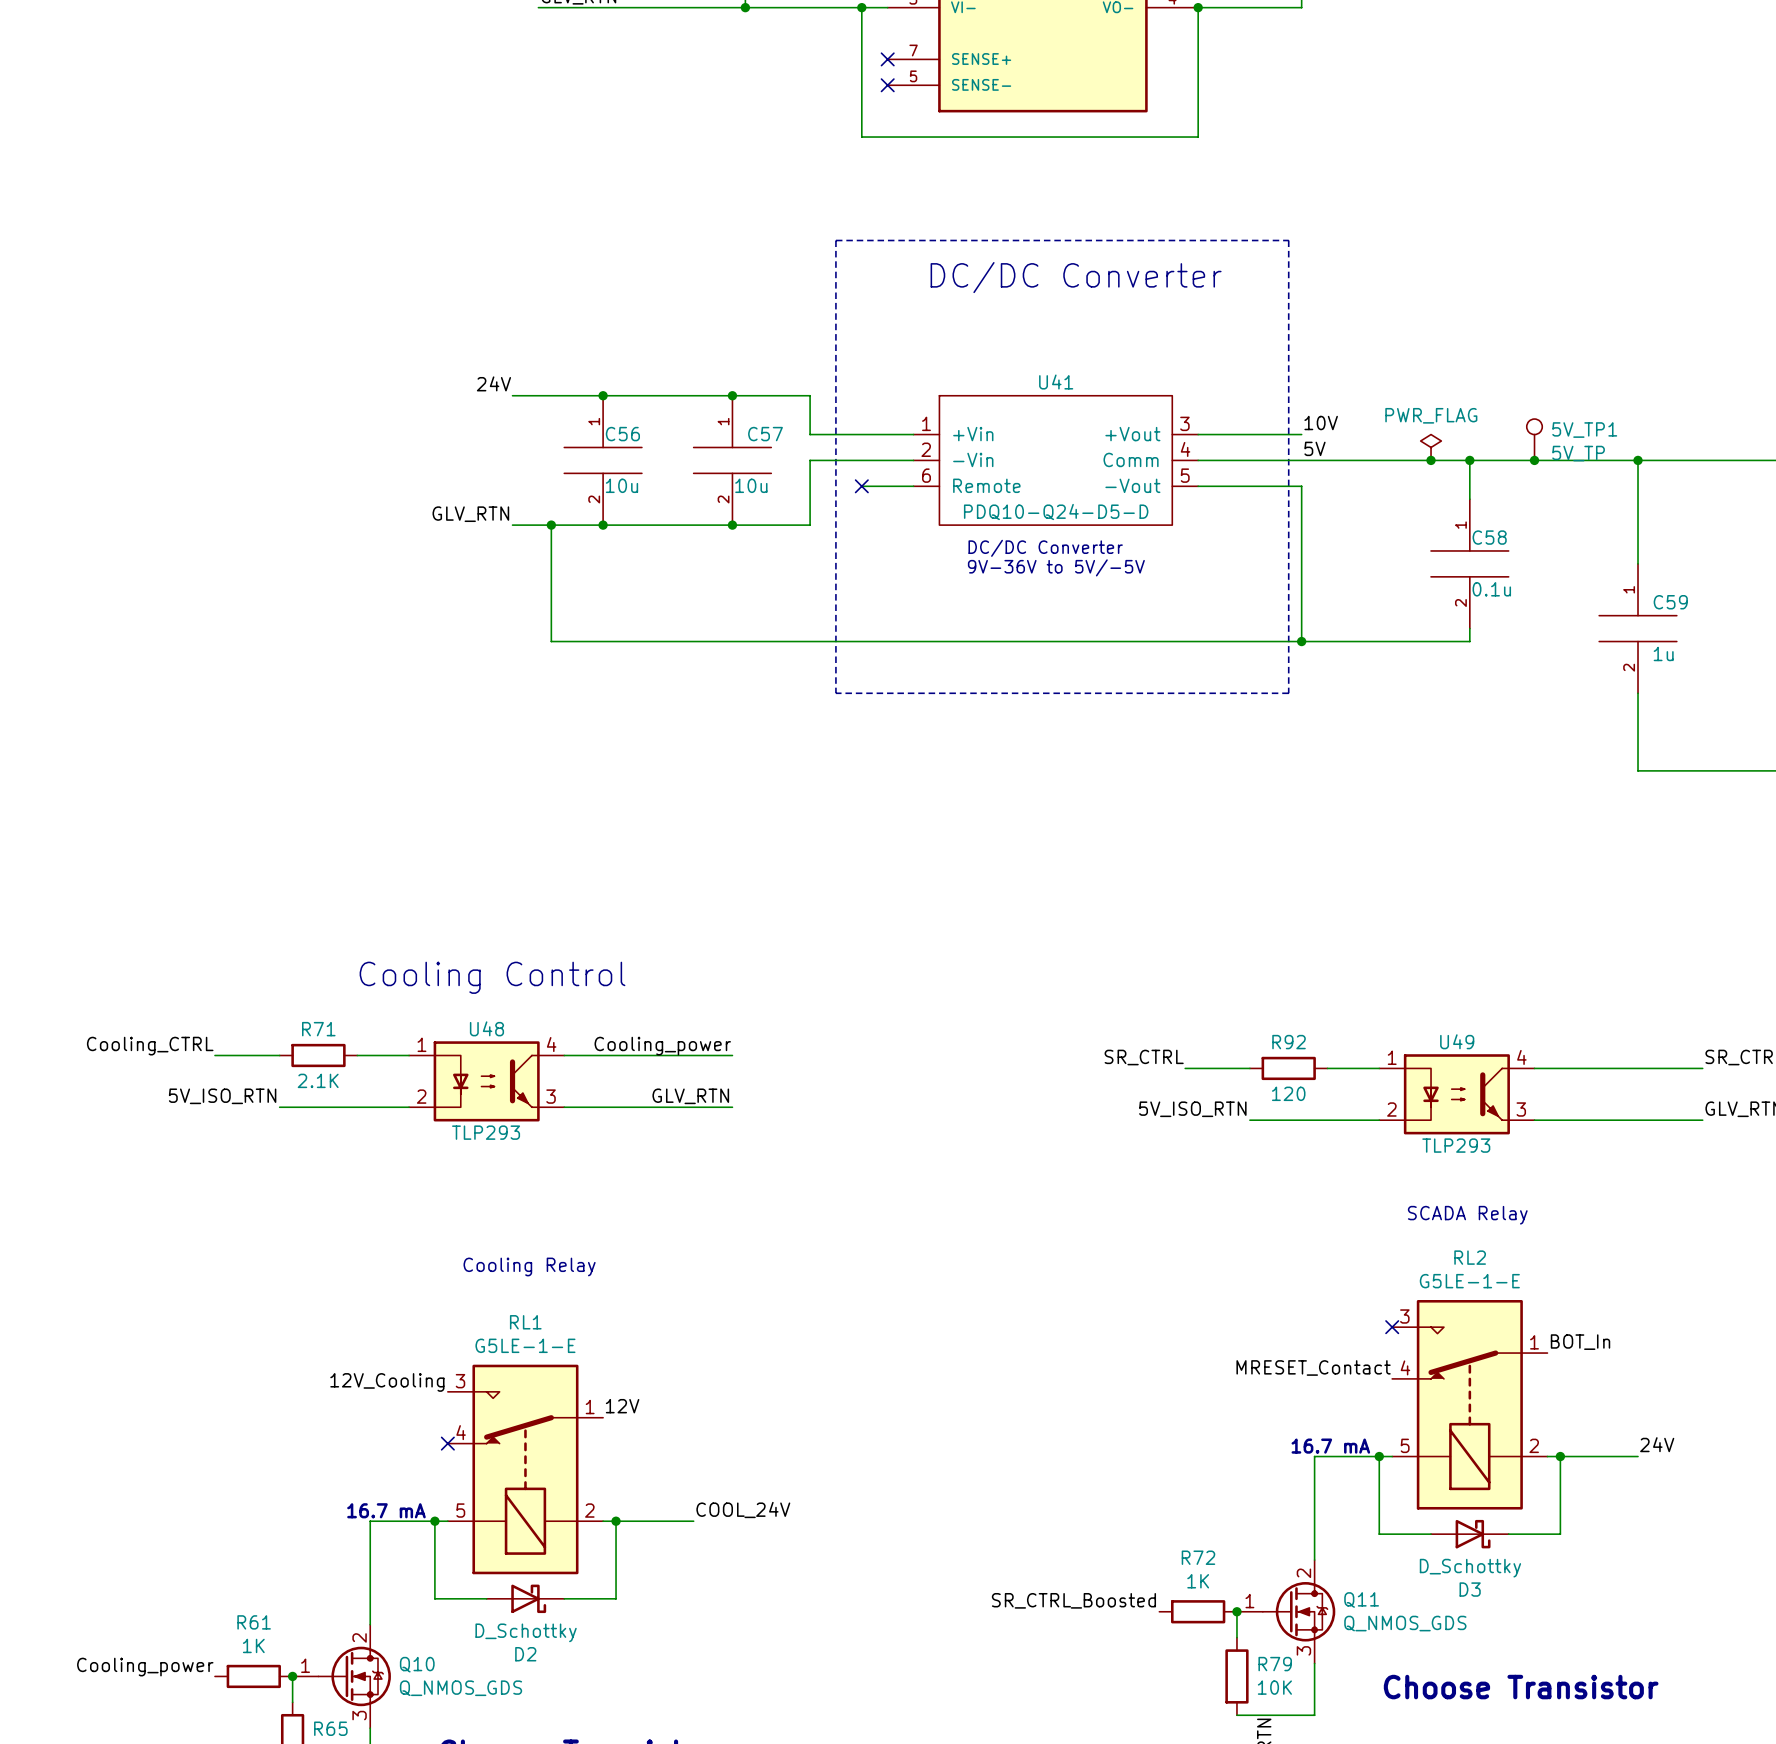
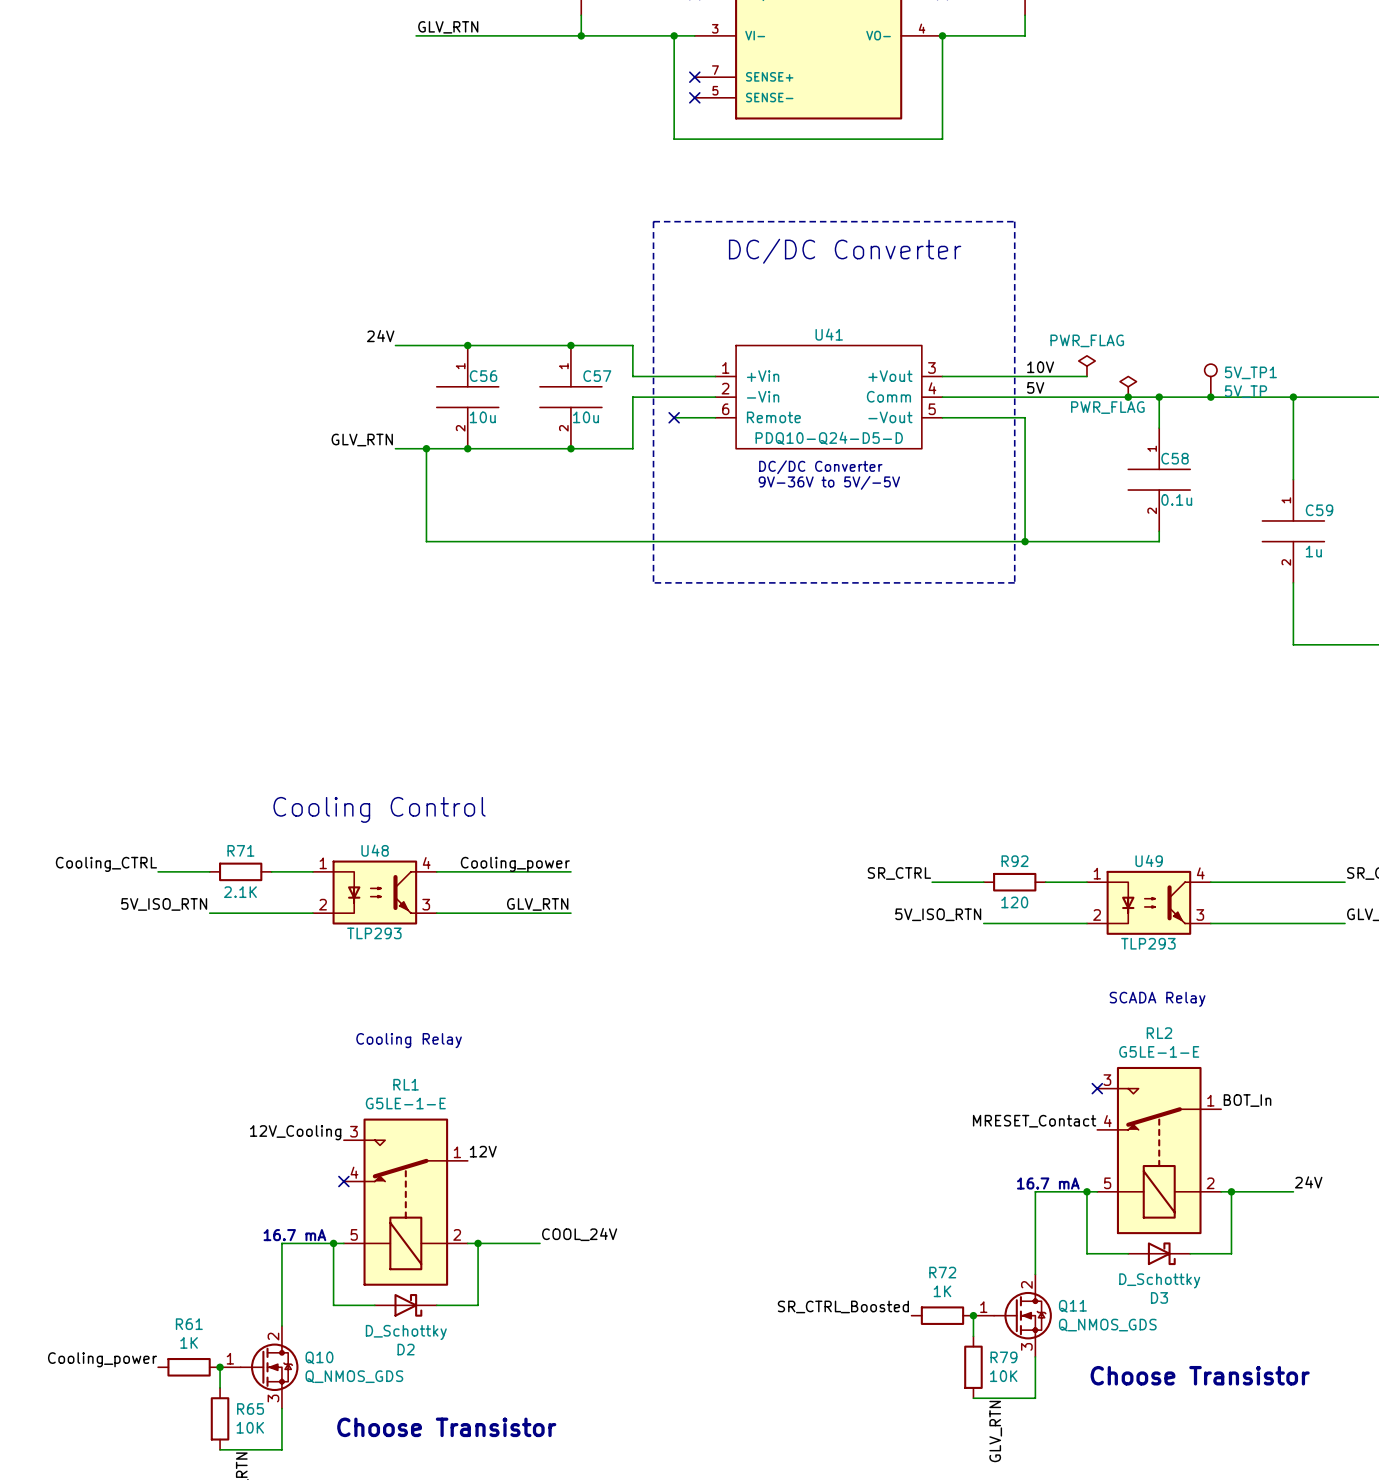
power symbol text position: PWR_FLAG (1431, 415) -> PWR_FLAG (1107, 407)
power symbol: none -> PWR_FLAG (1086, 366)
wire: none -> (1025, 376) (1086, 376)

